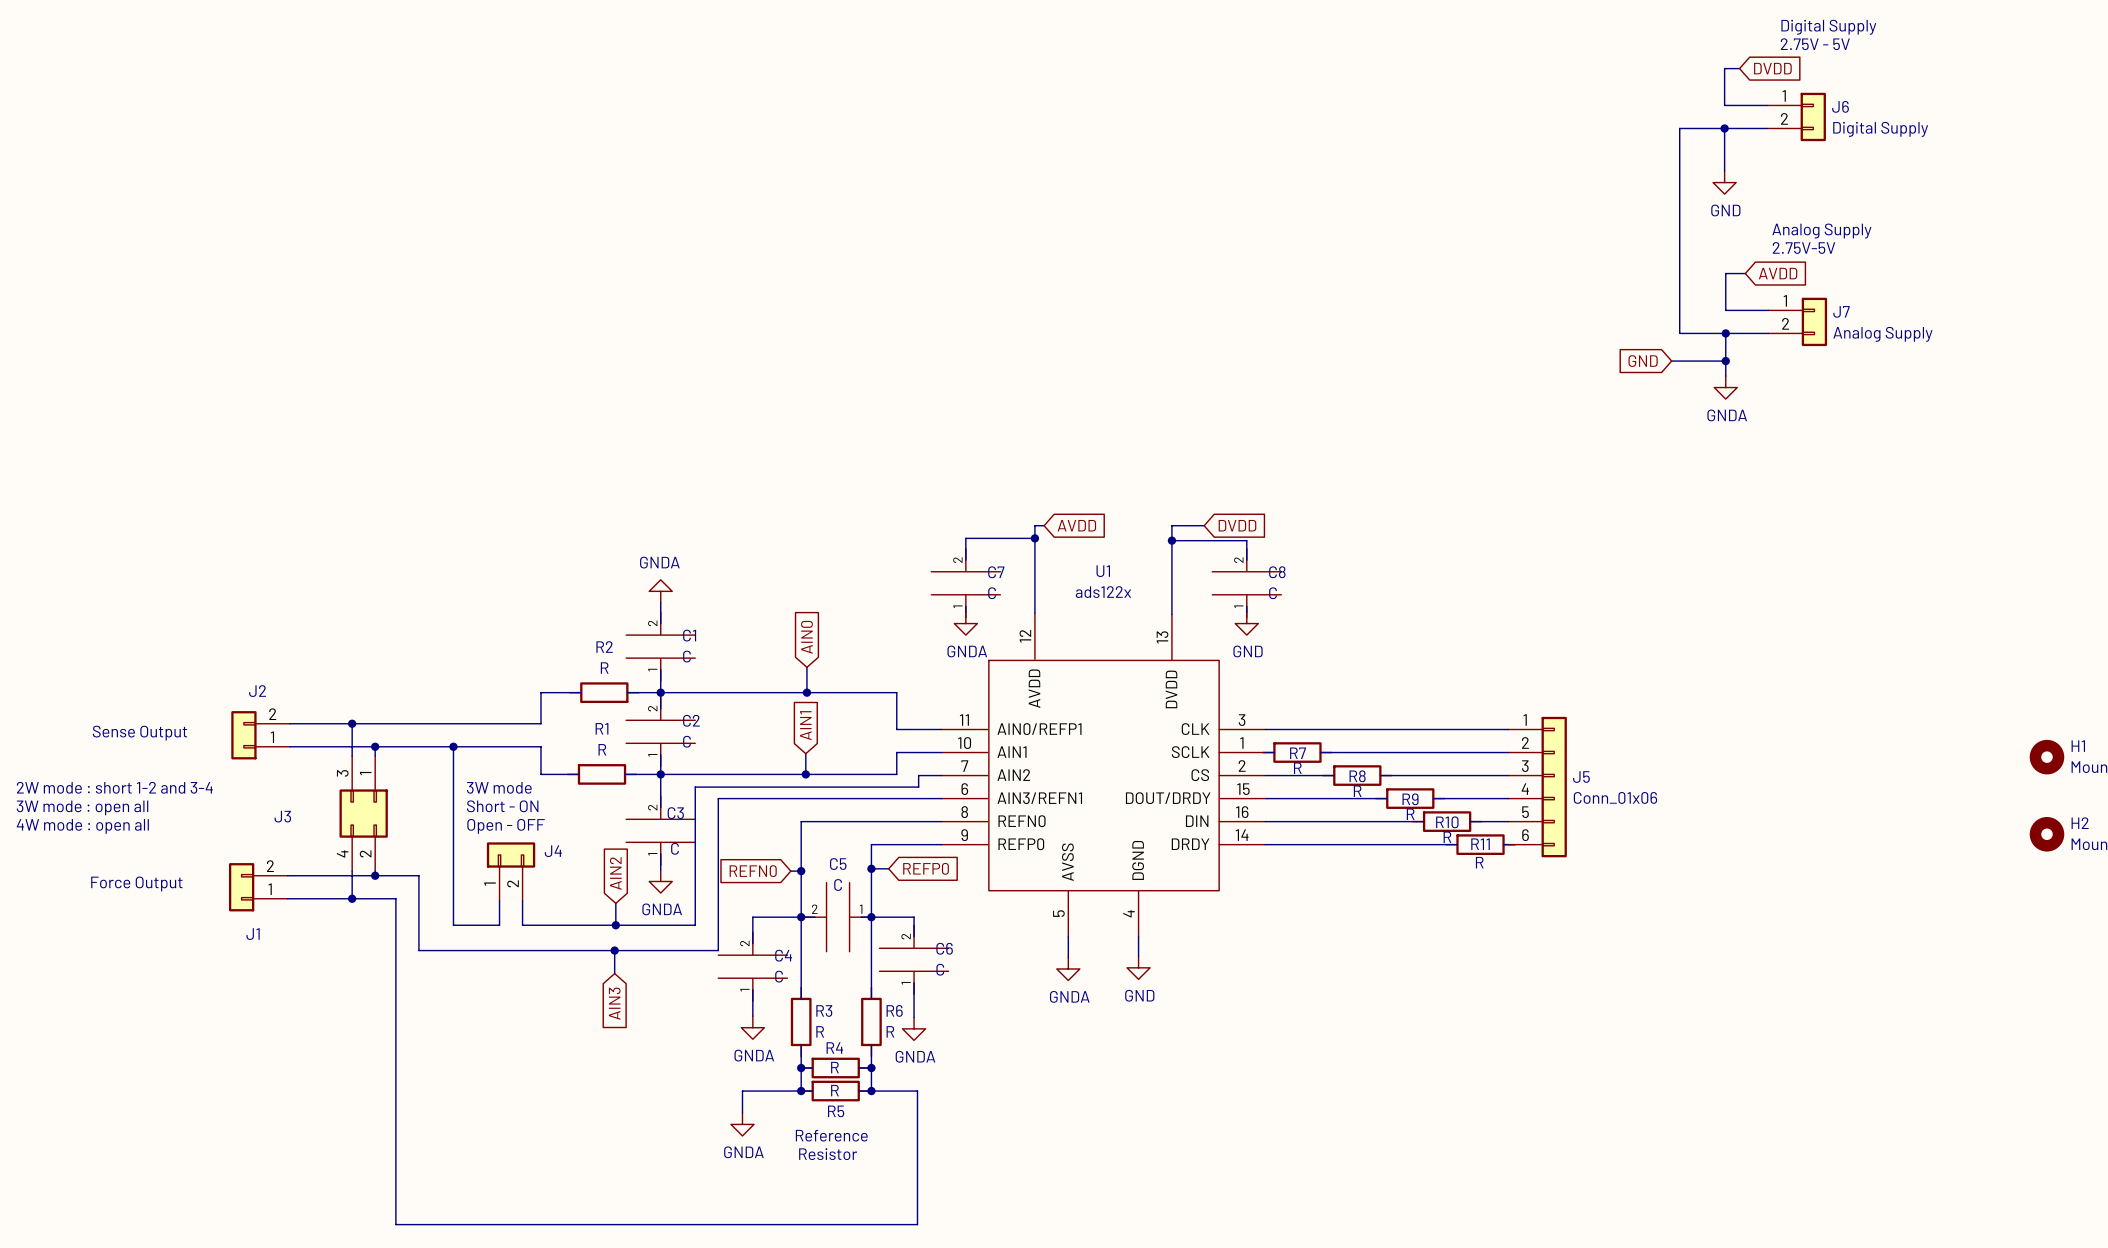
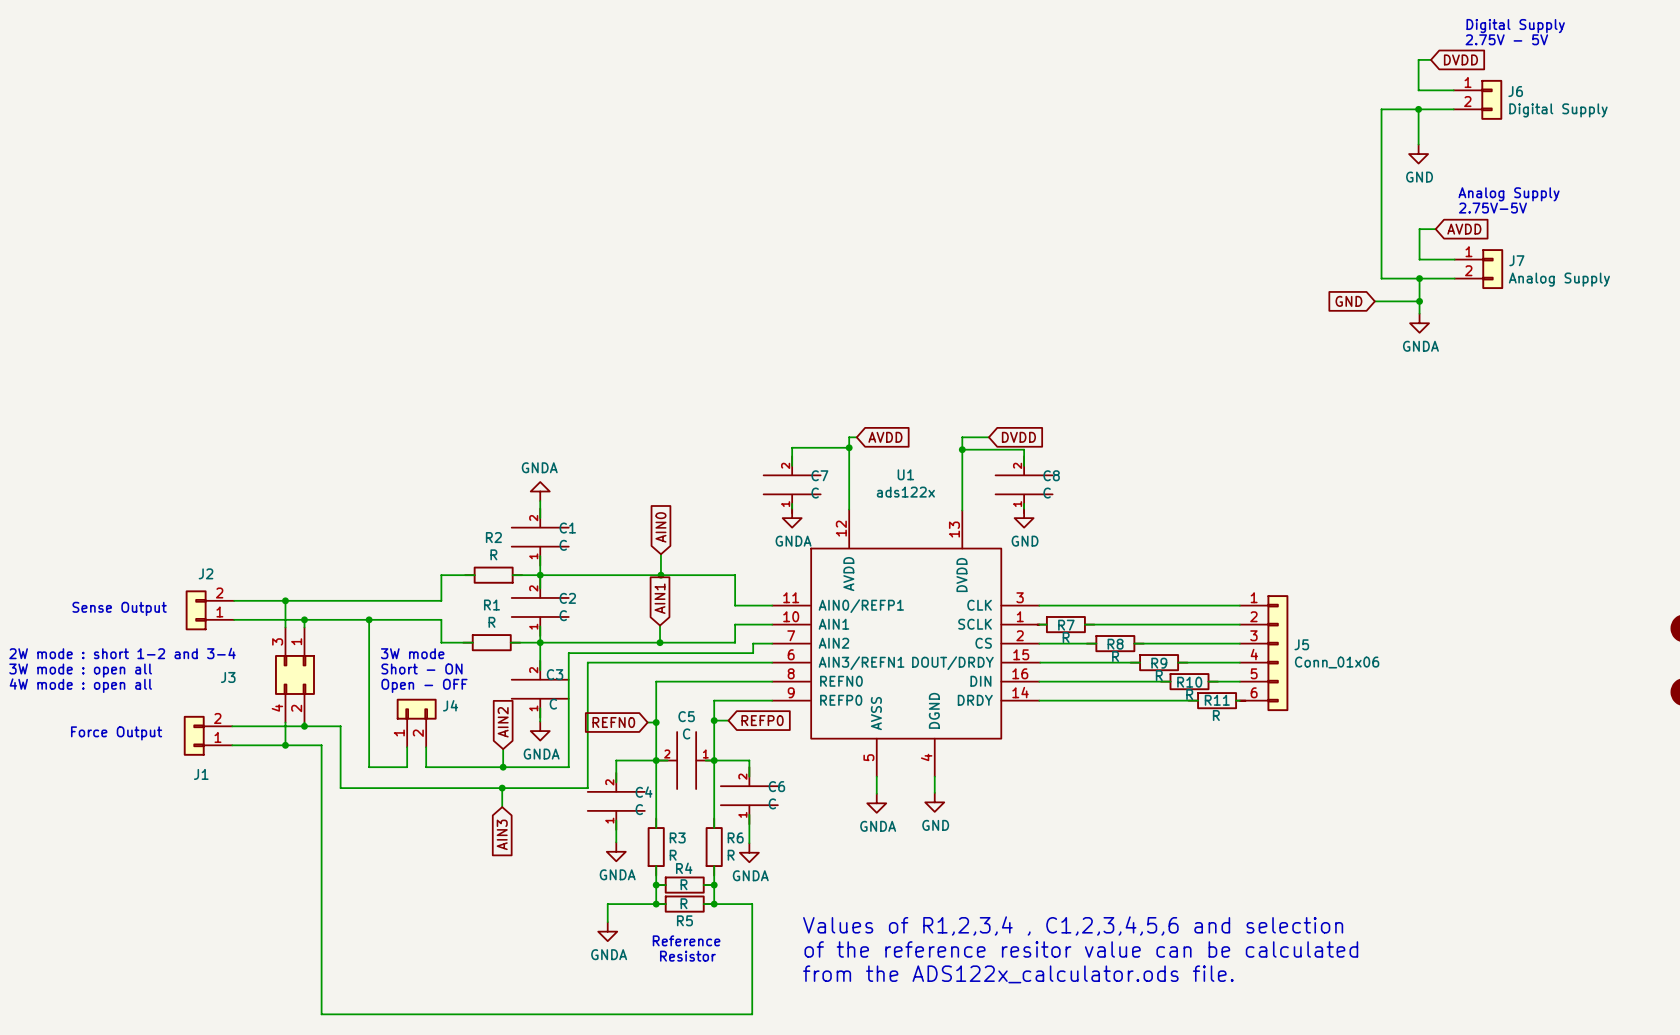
text: none -> Values of R1,2,3,4 , C1,2,3,4,5,6 and selection (1073, 926)
text: none -> of the reference resitor value can be calculated (1081, 949)
text: none -> from the ADS122x_calculator.ods file. (1018, 974)

